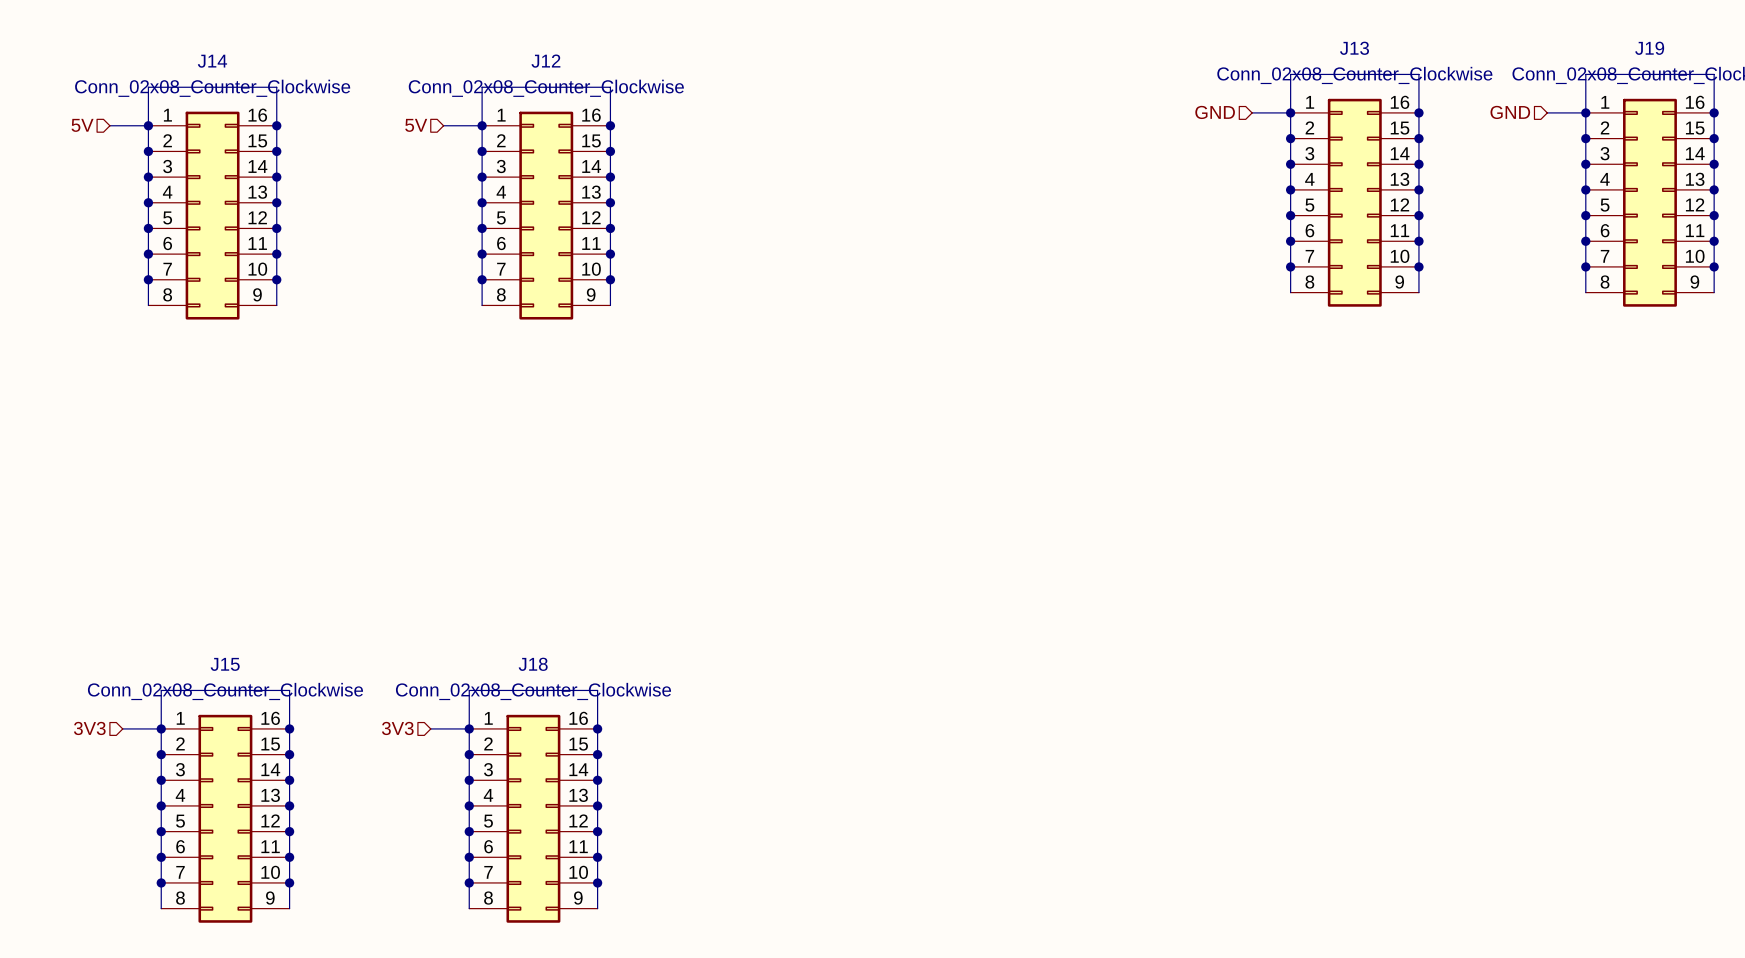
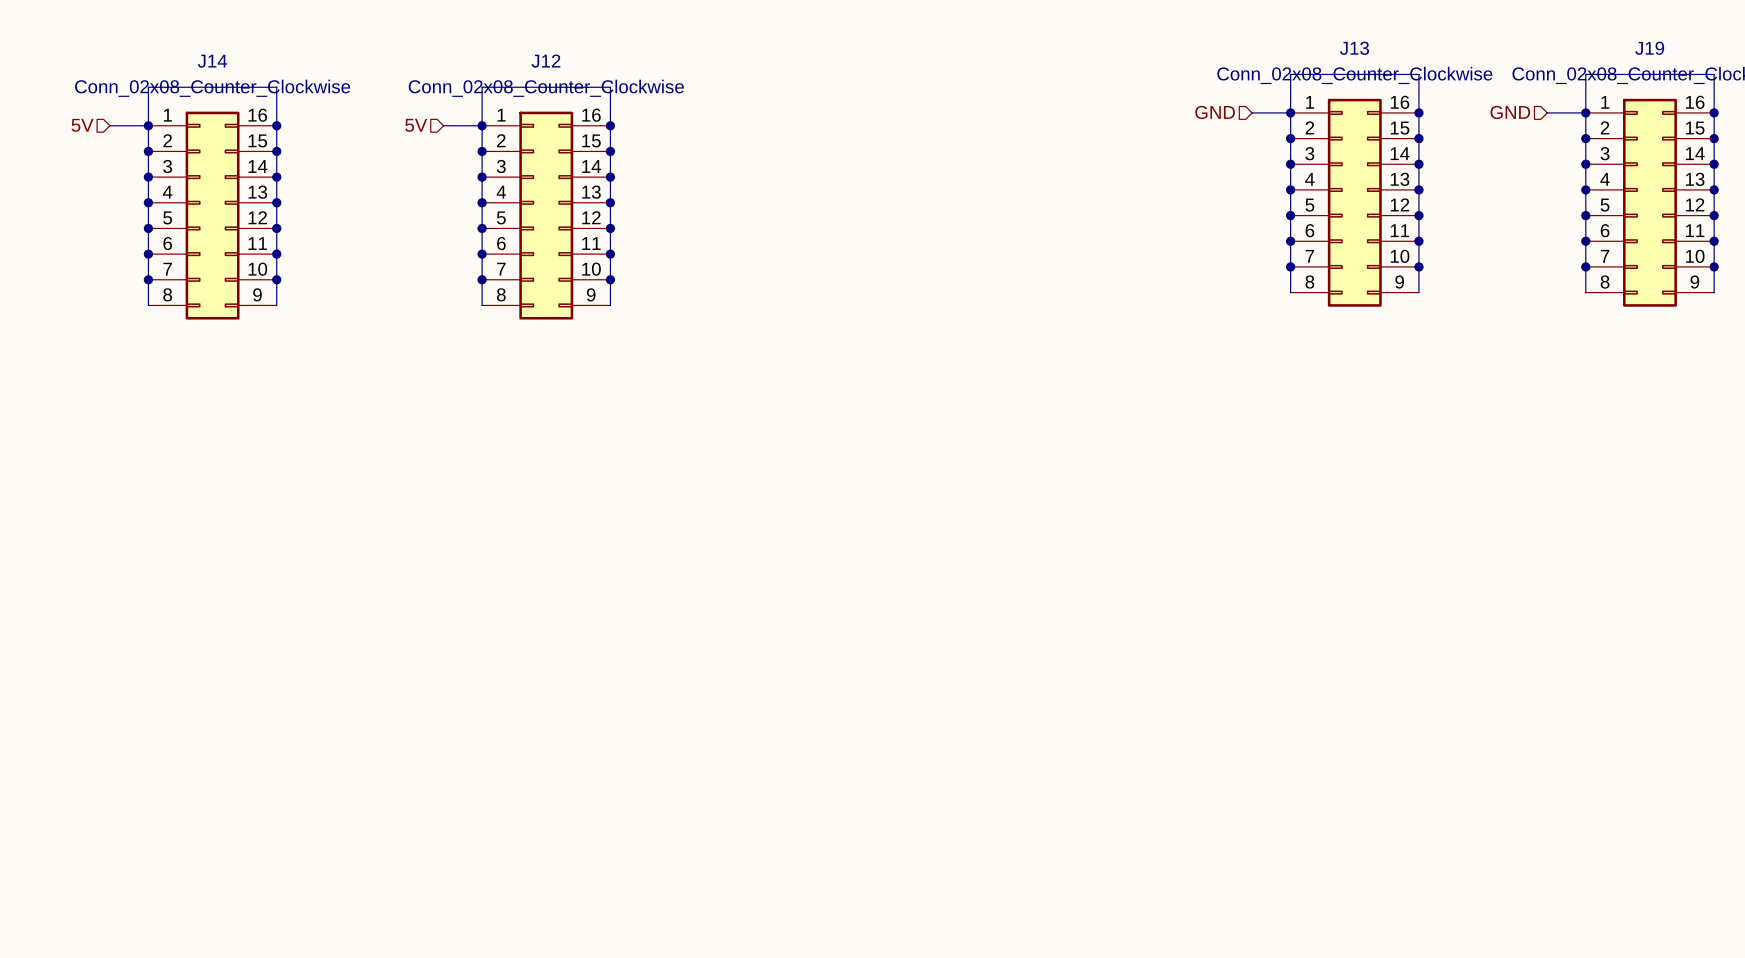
hierarchical label: 3V3 (89, 728) -> none
wire: (122, 728) (161, 728) -> none
junction: (161, 728) -> none
junction: (289, 728) -> none
hierarchical label: 3V3 (397, 728) -> none
wire: (430, 728) (469, 728) -> none
junction: (469, 728) -> none
junction: (597, 728) -> none
junction: (161, 754) -> none
junction: (289, 754) -> none
junction: (469, 754) -> none
junction: (597, 754) -> none
junction: (161, 780) -> none
junction: (289, 780) -> none
junction: (469, 780) -> none
junction: (597, 780) -> none
junction: (161, 805) -> none
junction: (289, 805) -> none
junction: (469, 805) -> none
junction: (597, 805) -> none
J15: Conn_02x08_Counter_Clockwise (225, 818) -> none
J18: Conn_02x08_Counter_Clockwise (533, 818) -> none
junction: (161, 831) -> none
junction: (289, 831) -> none
junction: (469, 831) -> none
junction: (597, 831) -> none
junction: (161, 857) -> none
junction: (289, 857) -> none
junction: (469, 857) -> none
junction: (597, 857) -> none
junction: (161, 882) -> none
junction: (289, 882) -> none
junction: (469, 882) -> none
junction: (597, 882) -> none
wire: (161, 908) (161, 690) (289, 690) (289, 908) -> none
wire: (469, 908) (469, 690) (597, 690) (597, 908) -> none

